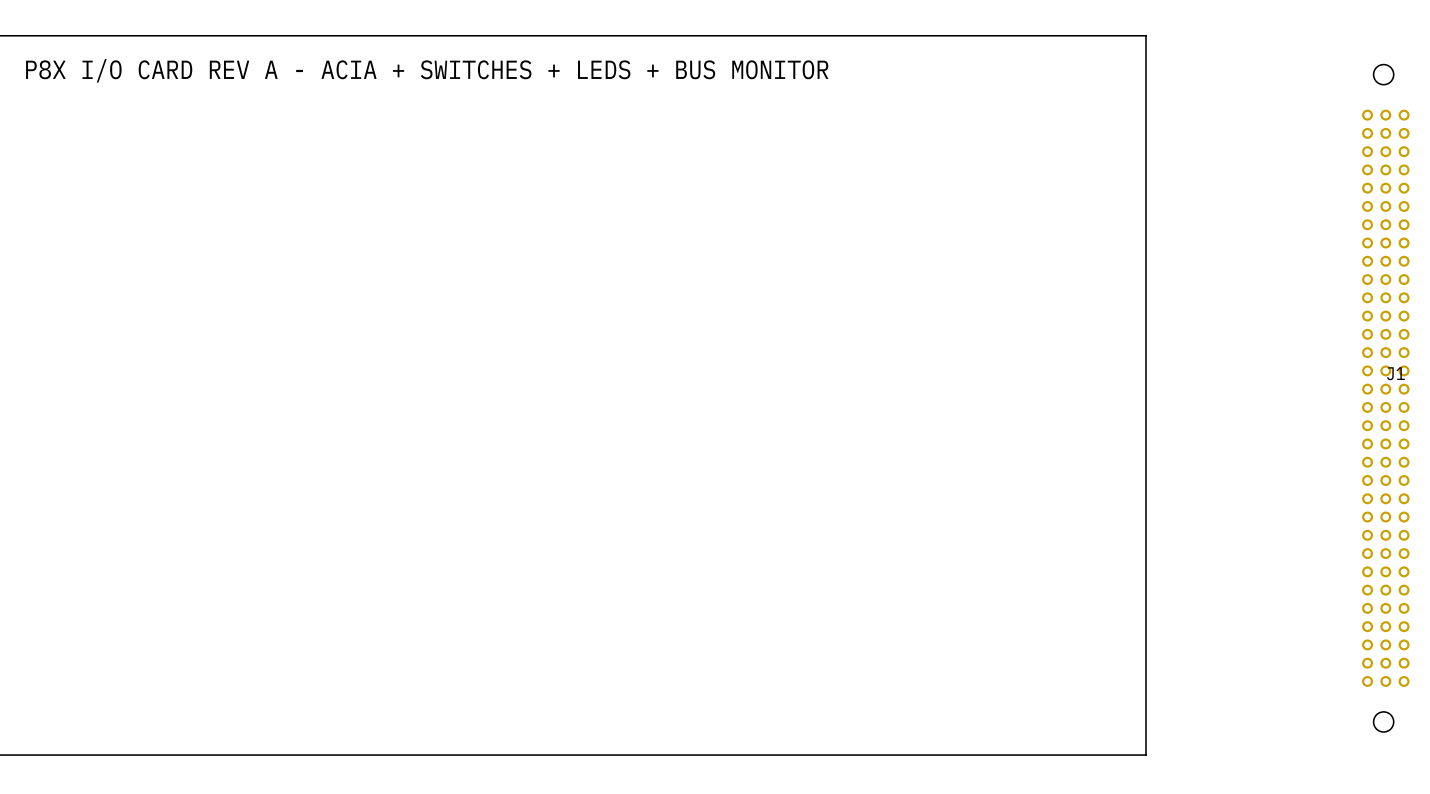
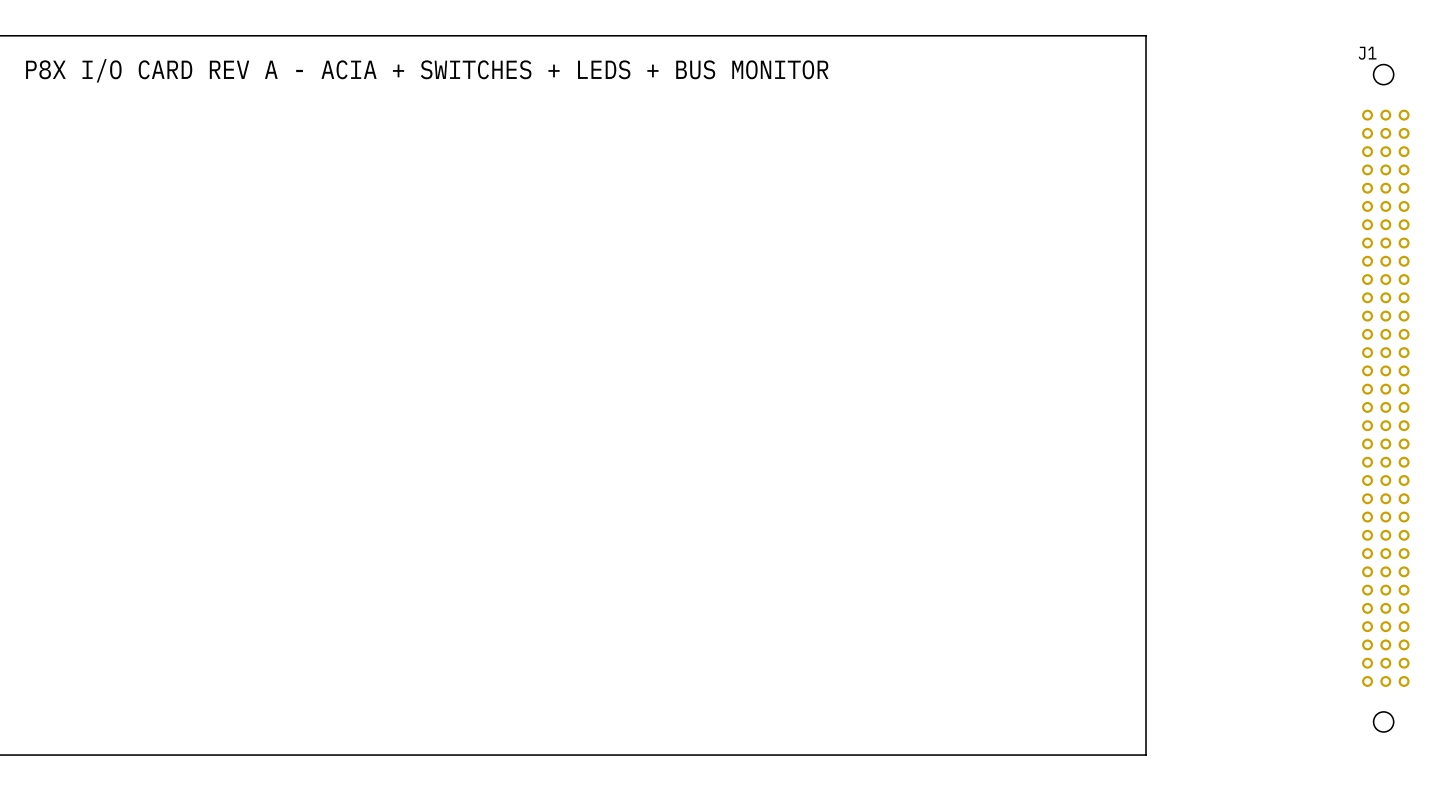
J1 name position: J1 (1395, 373) -> J1 (1367, 53)

